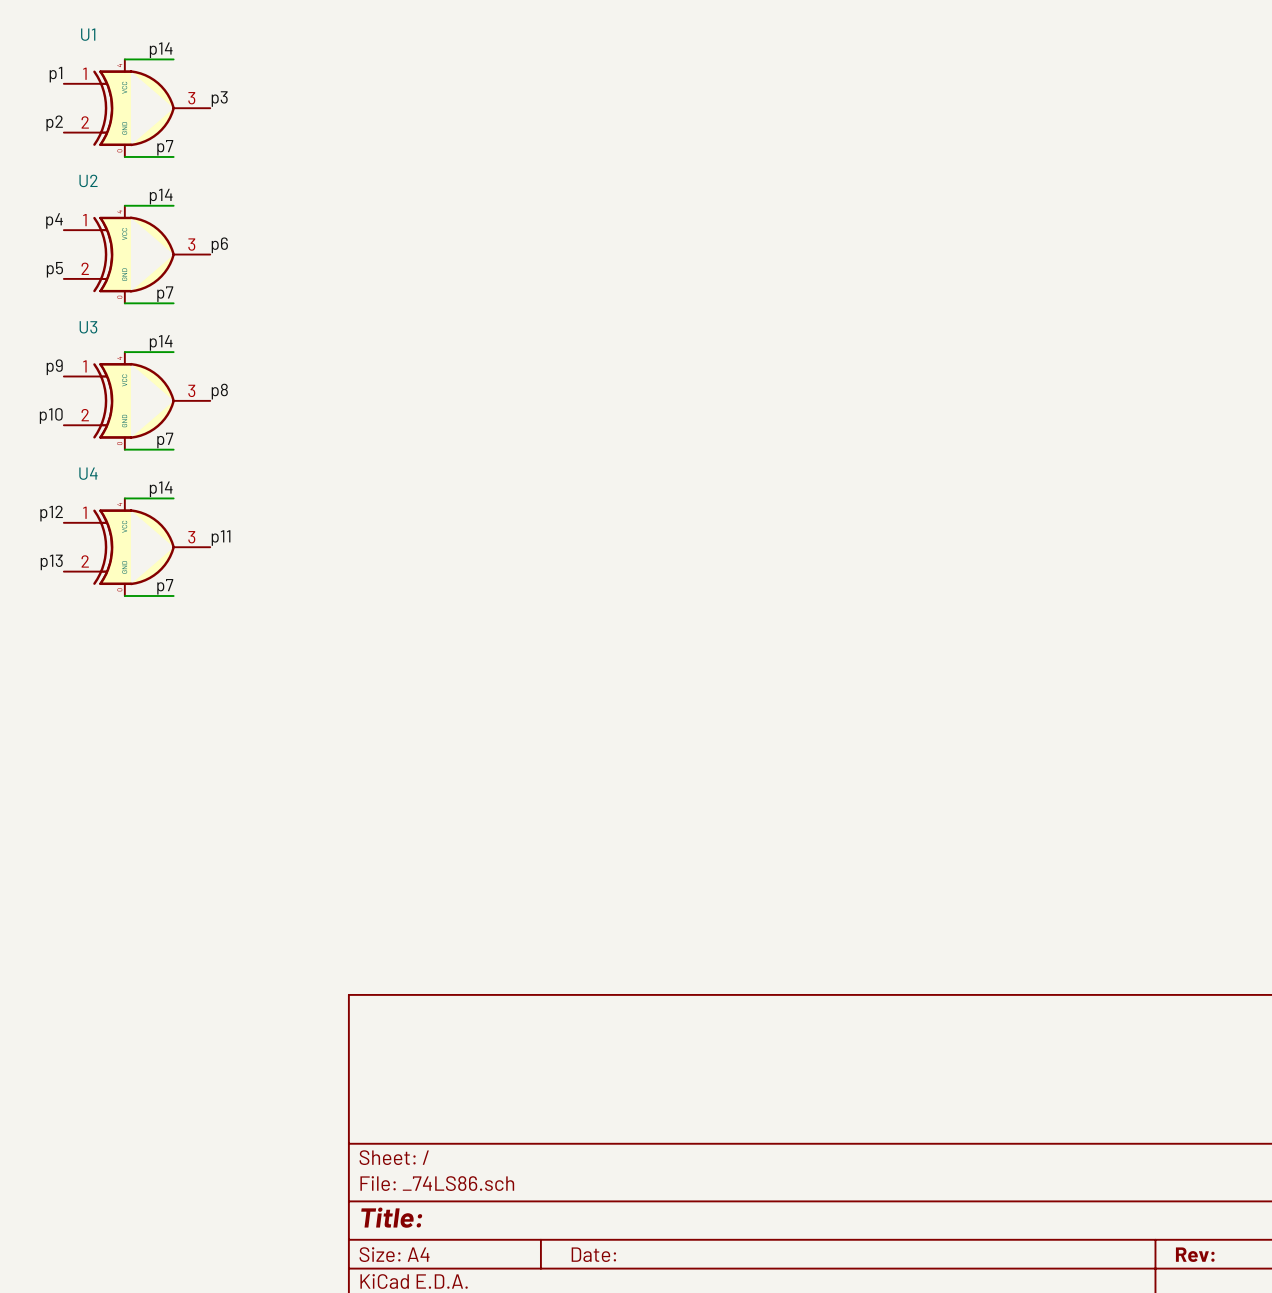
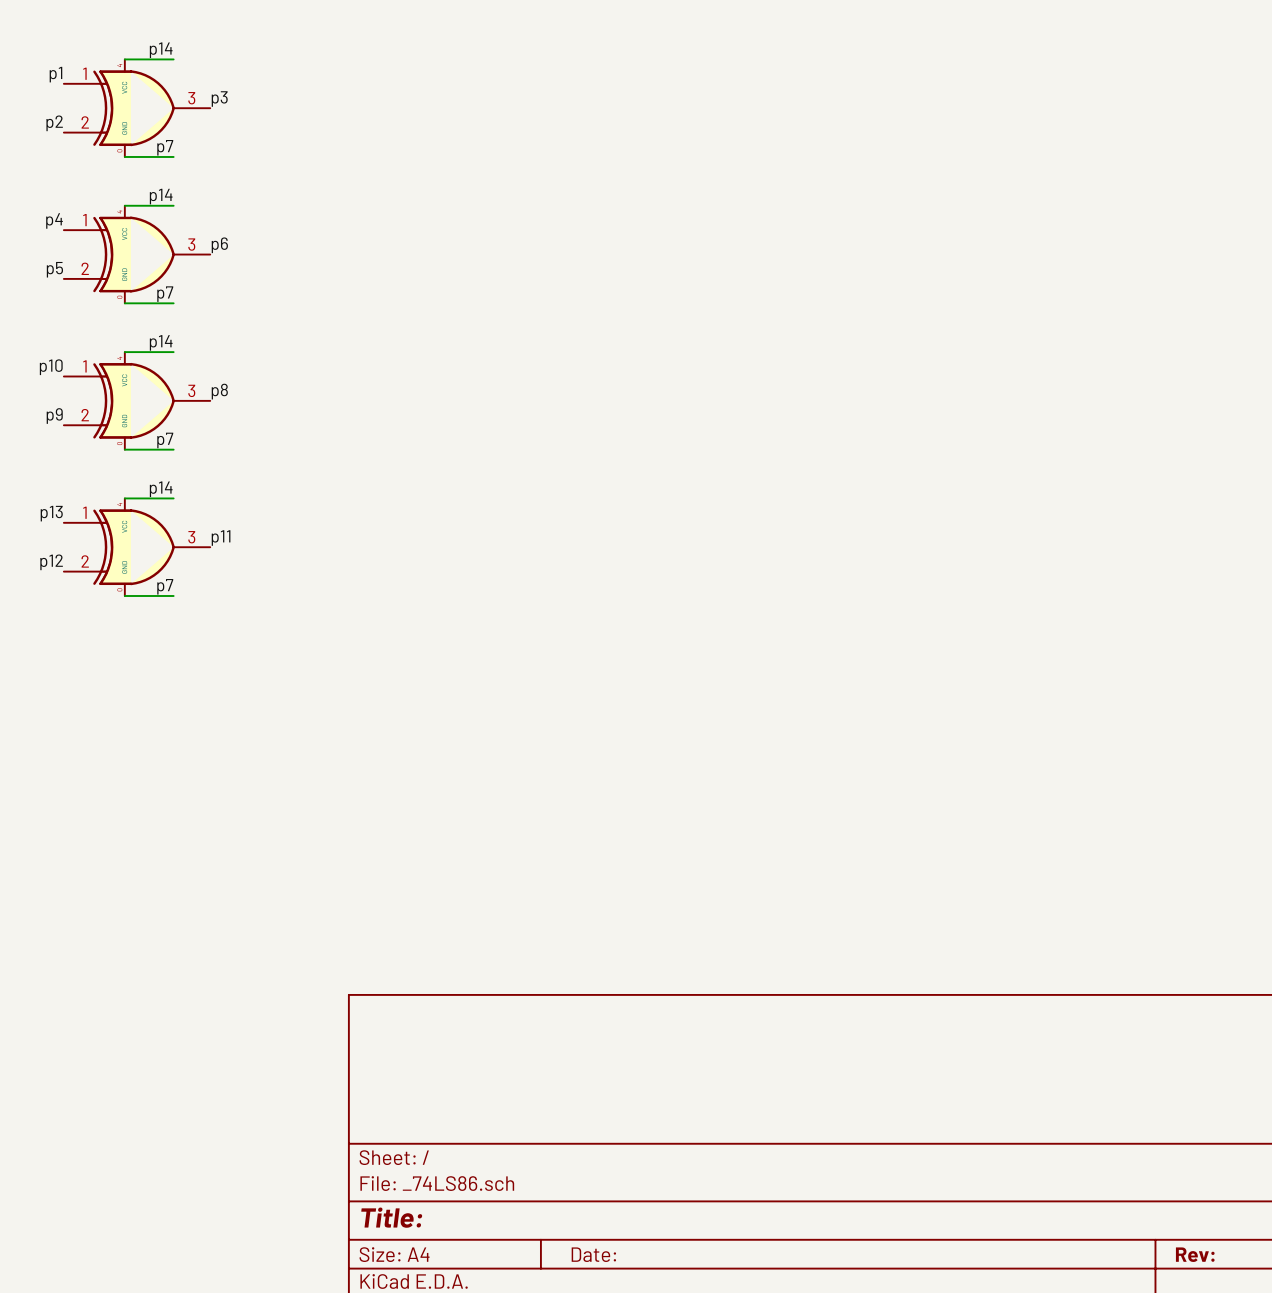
U1 name: U1 (88, 34) -> none
U2 name: U2 (88, 180) -> none
U3 name: U3 (88, 327) -> none
label: p9 (54, 367) -> p10 (51, 367)
label: p10 (51, 416) -> p9 (54, 416)
U4 name: U4 (88, 473) -> none
label: p12 (51, 513) -> p13 (51, 513)
label: p13 (51, 562) -> p12 (51, 562)

